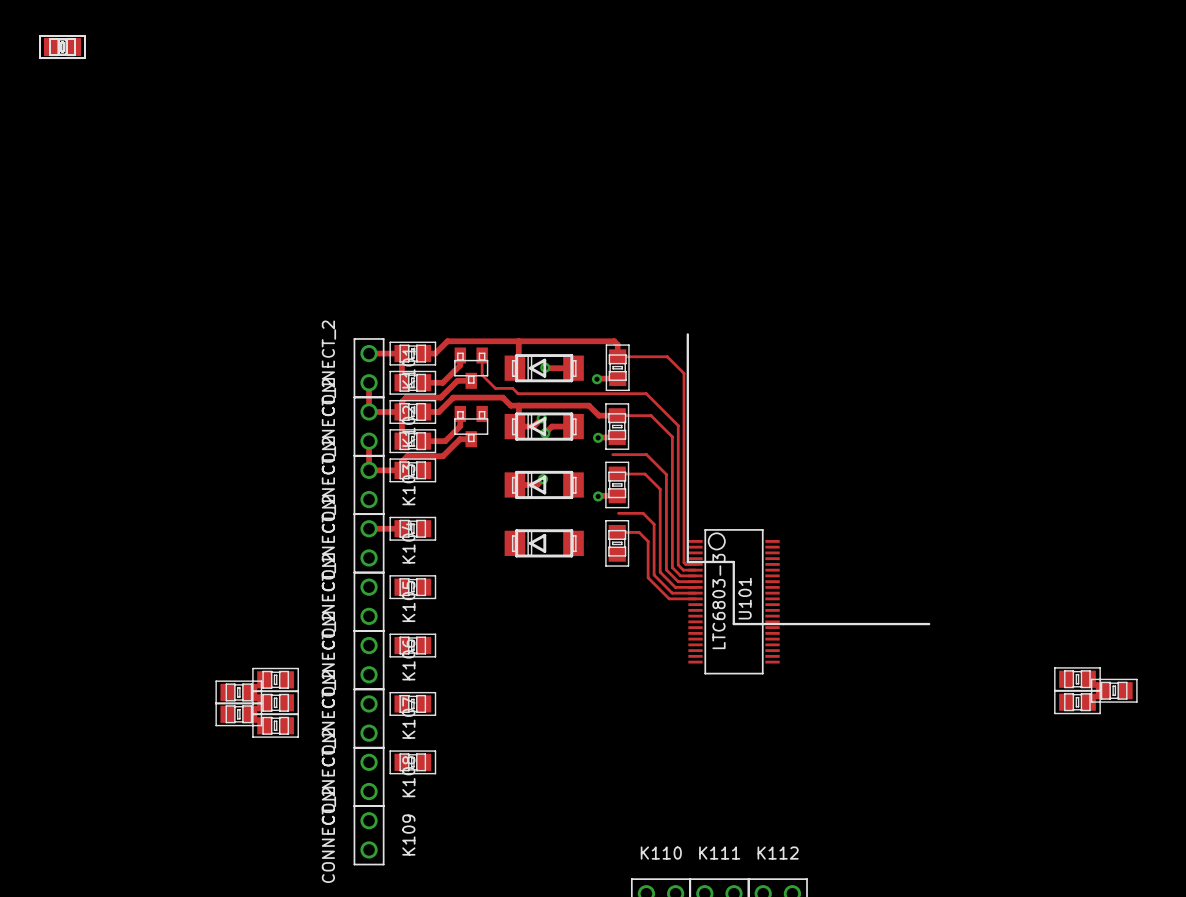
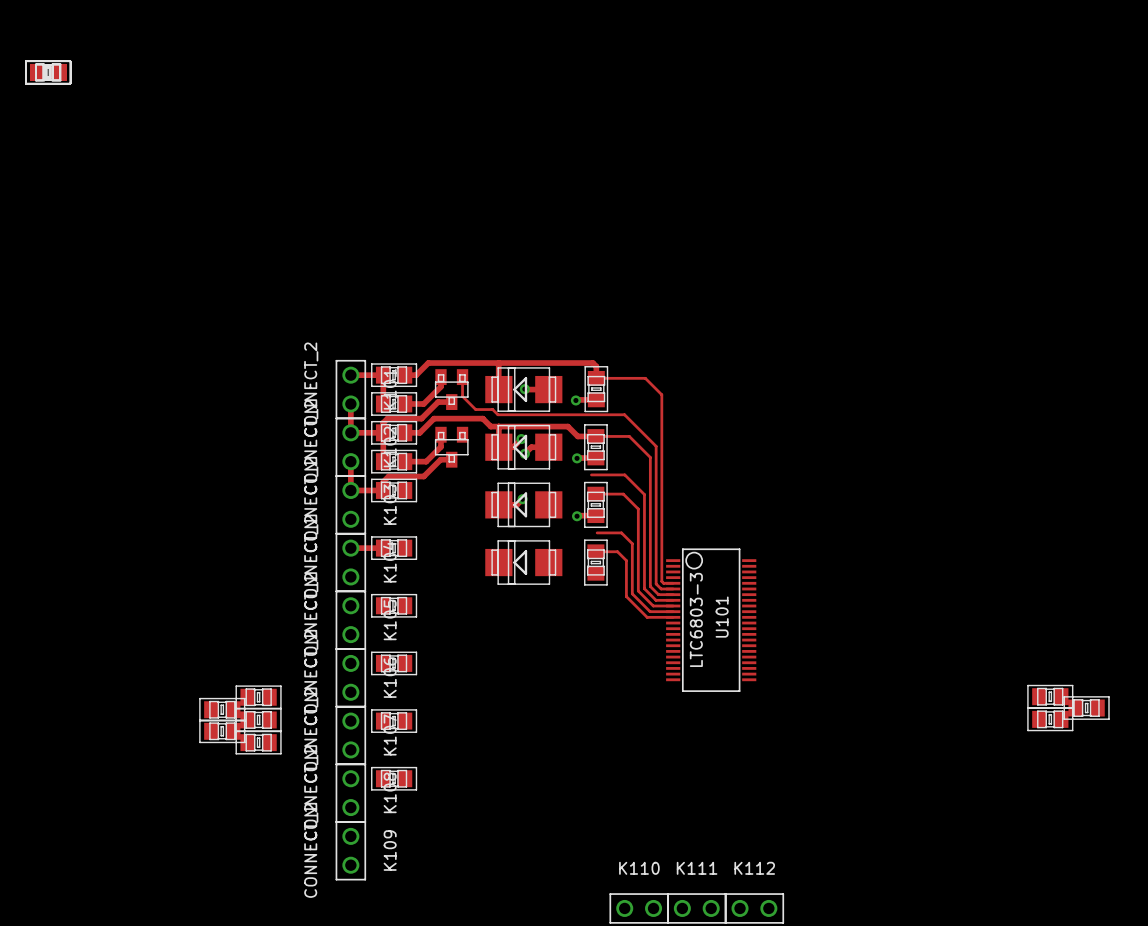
part: none -> (48, 72)
line: (687, 334) (687, 561) (733, 561) (733, 624) (929, 624) -> none
part footprint: [504, 354, 584, 383] -> [485, 367, 563, 412]
part footprint: [504, 412, 584, 441] -> [485, 425, 563, 470]
part footprint: [504, 470, 584, 500] -> [485, 482, 563, 528]
part footprint: [504, 529, 584, 558] -> [485, 540, 563, 585]

